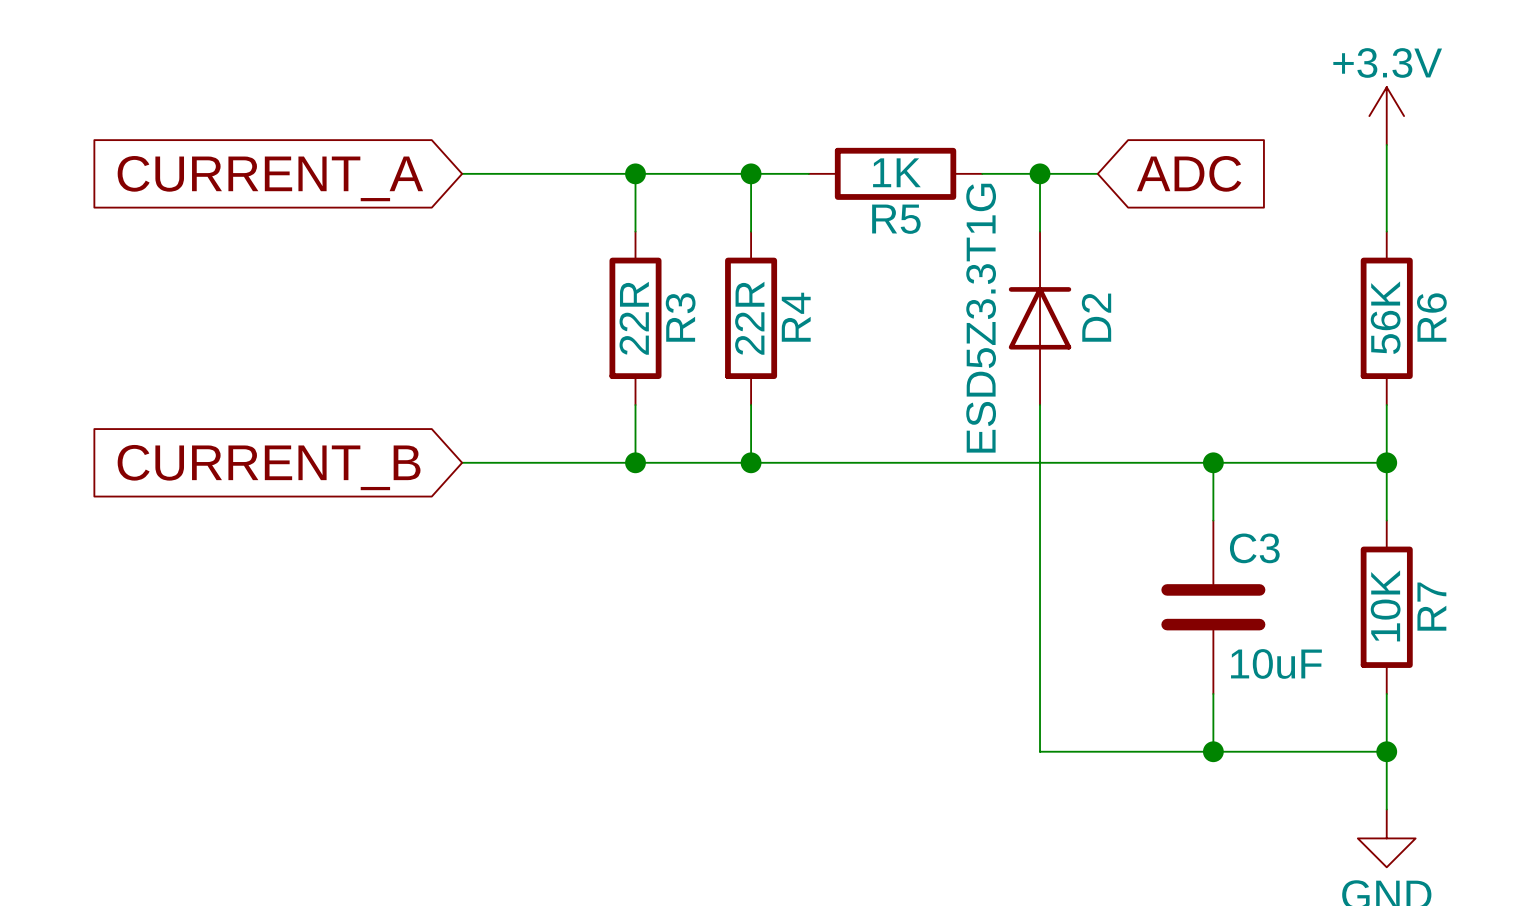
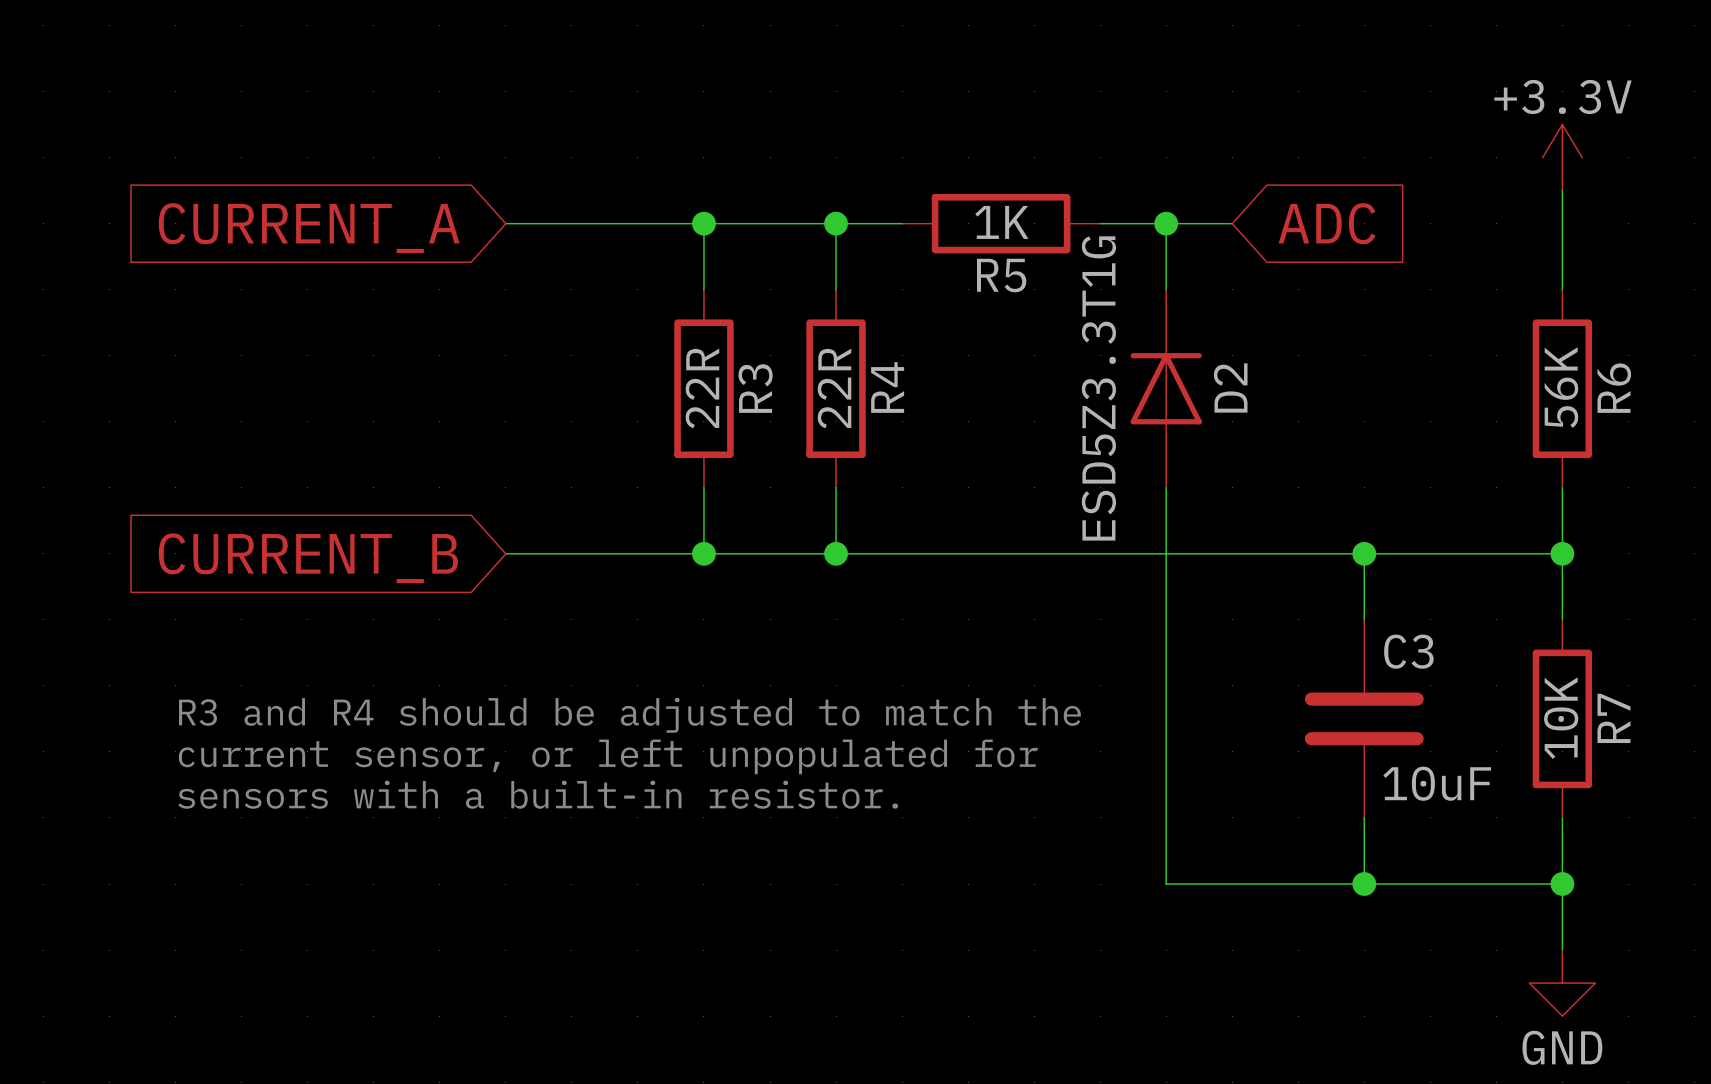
text: none -> R3 and R4 should be adjusted to match the (629, 715)
text: none -> current sensor, or left unpopulated for (608, 756)
text: none -> sensors with a built-in resistor. (538, 794)

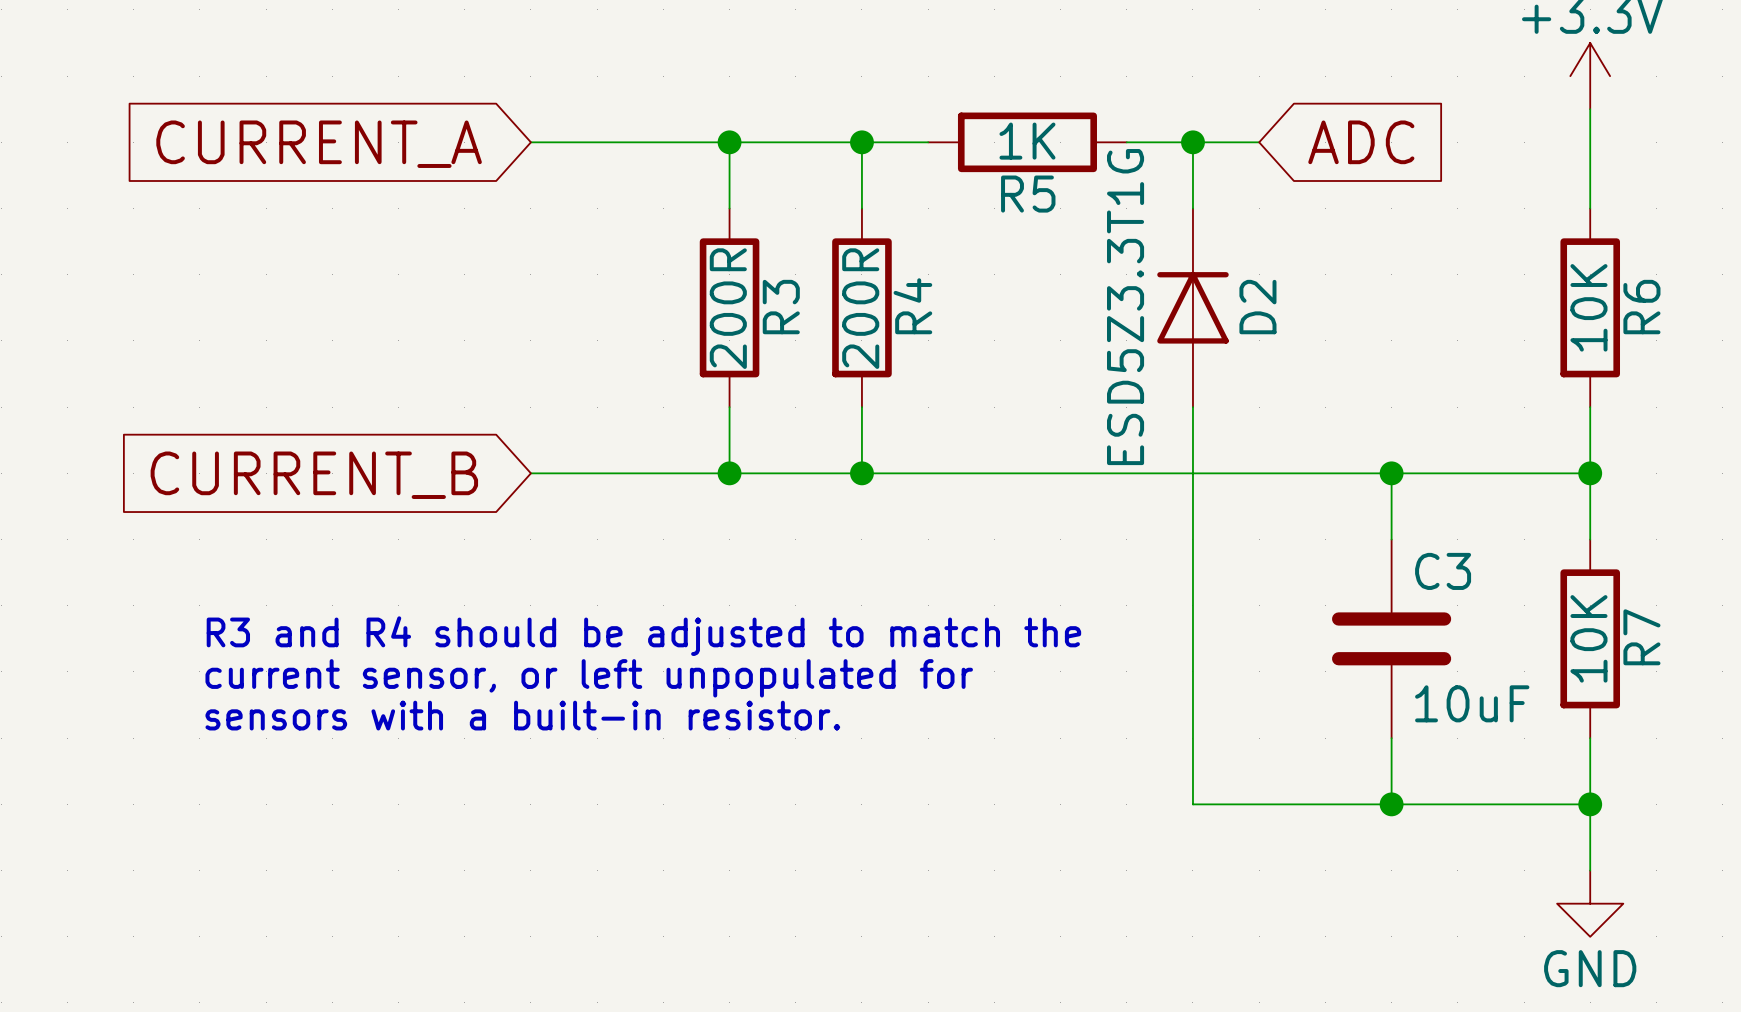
R6 value: 56K (1561, 387) -> 10K (1588, 307)
R3 value: 22R (702, 388) -> 200R (728, 308)
R4 value: 22R (834, 388) -> 200R (860, 308)

